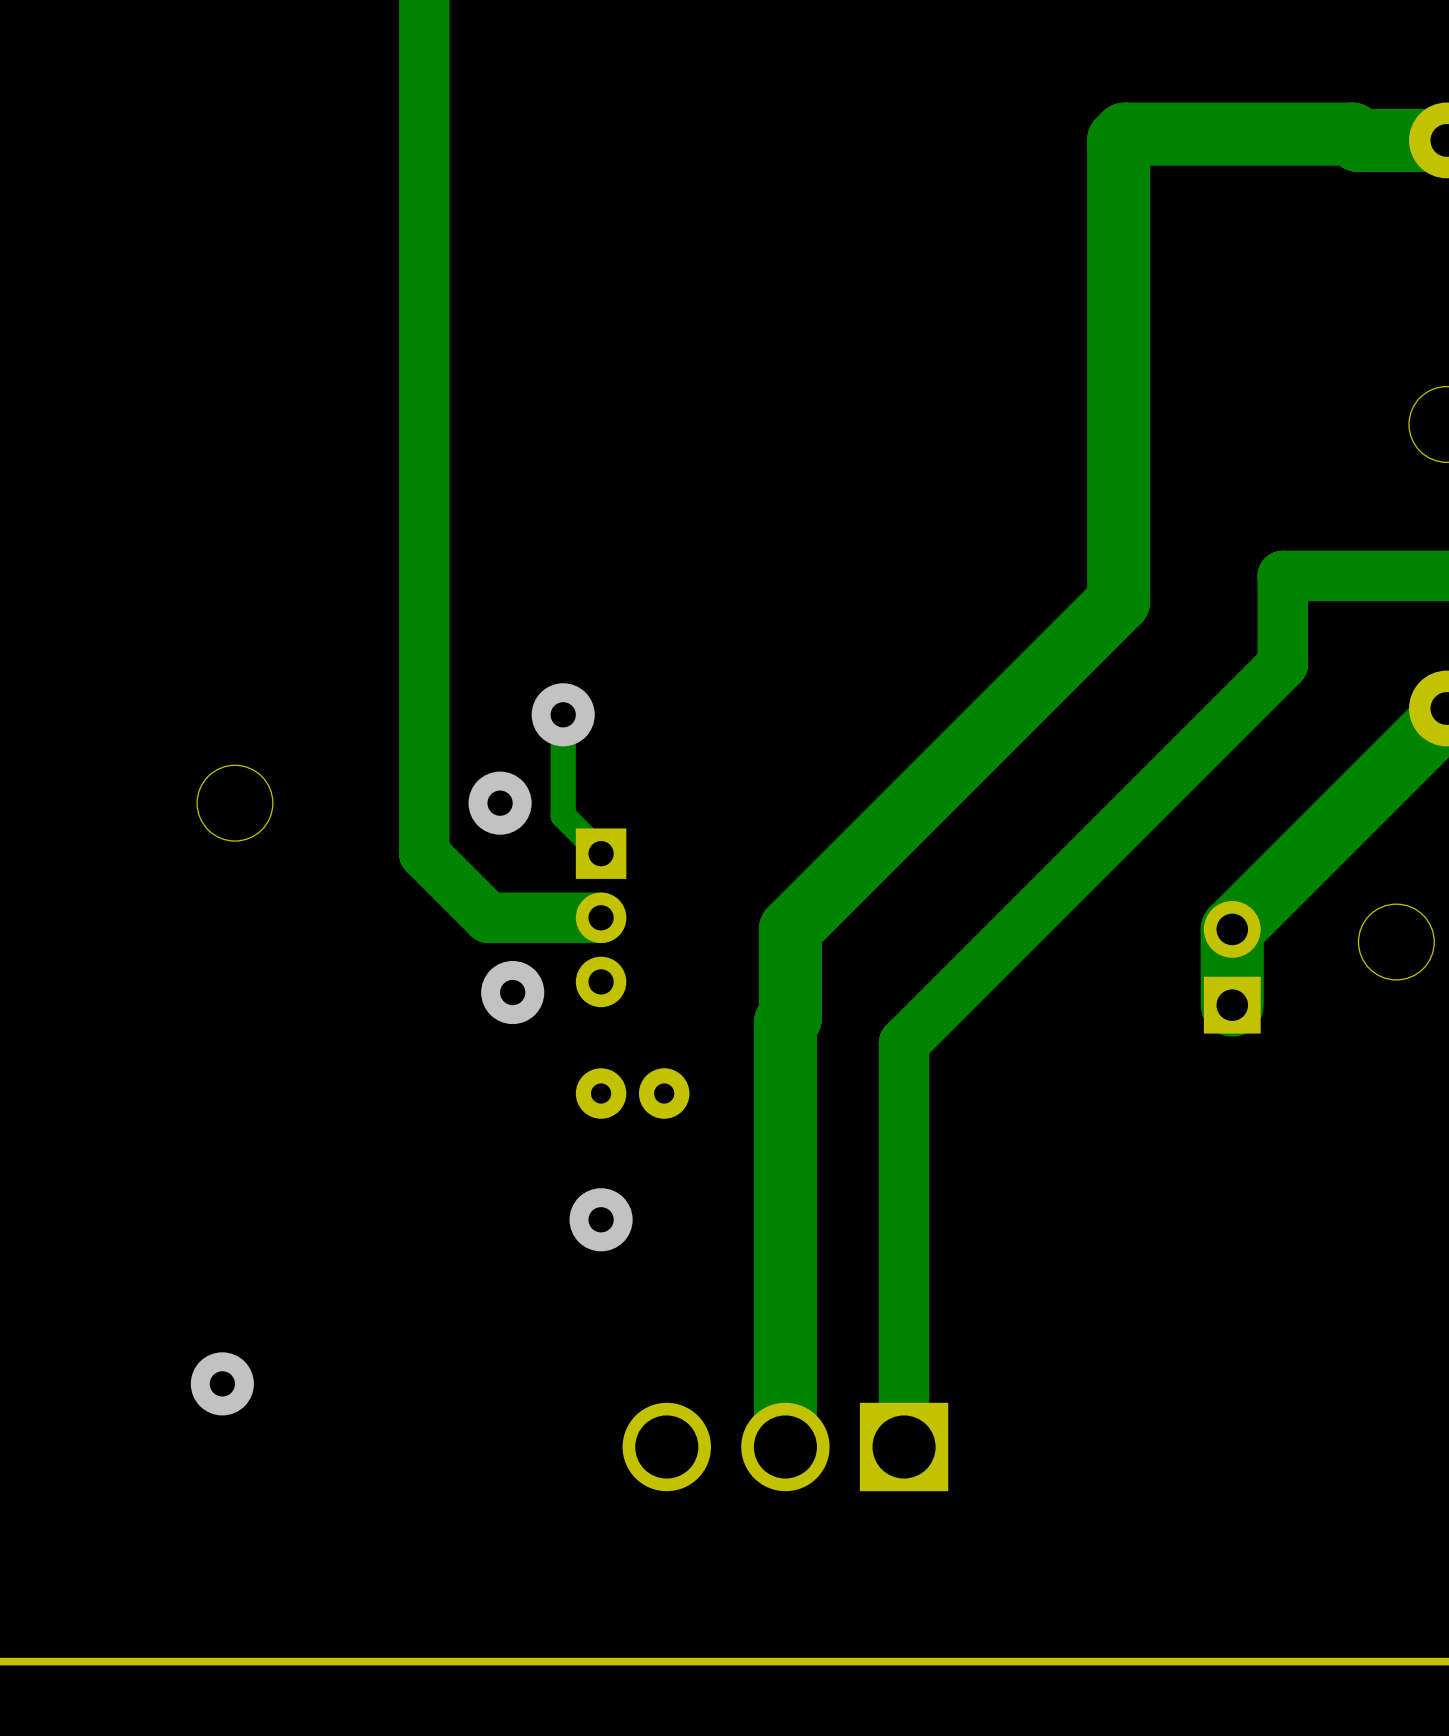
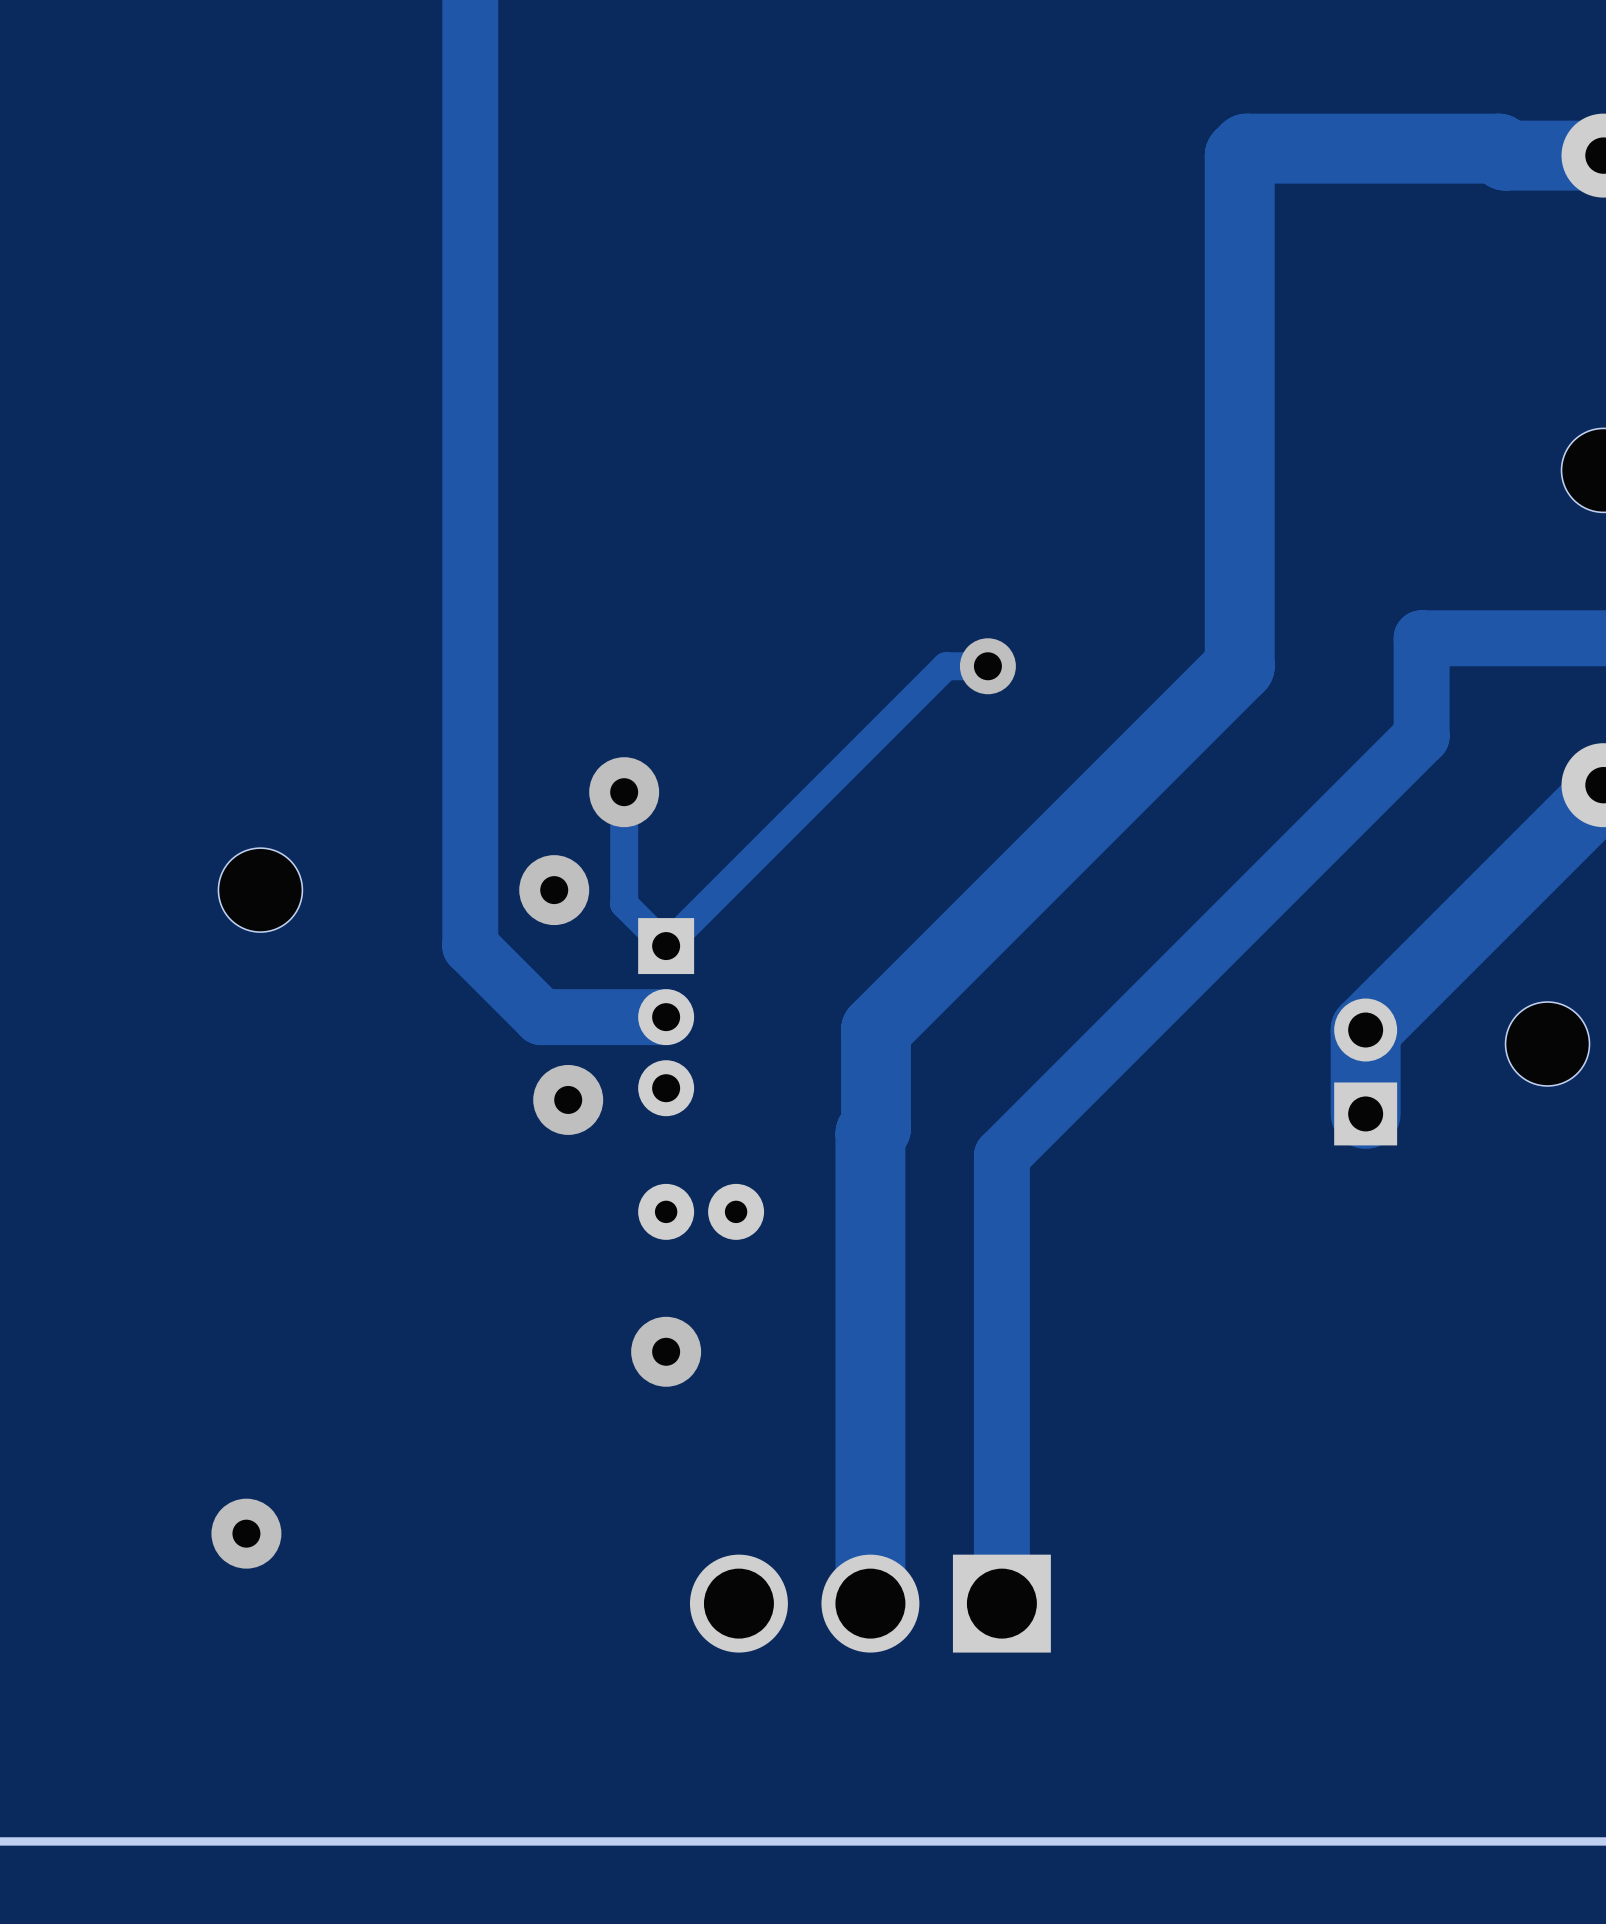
track: none -> (987, 666) (945, 666) (666, 946)
via: none -> (987, 666)

